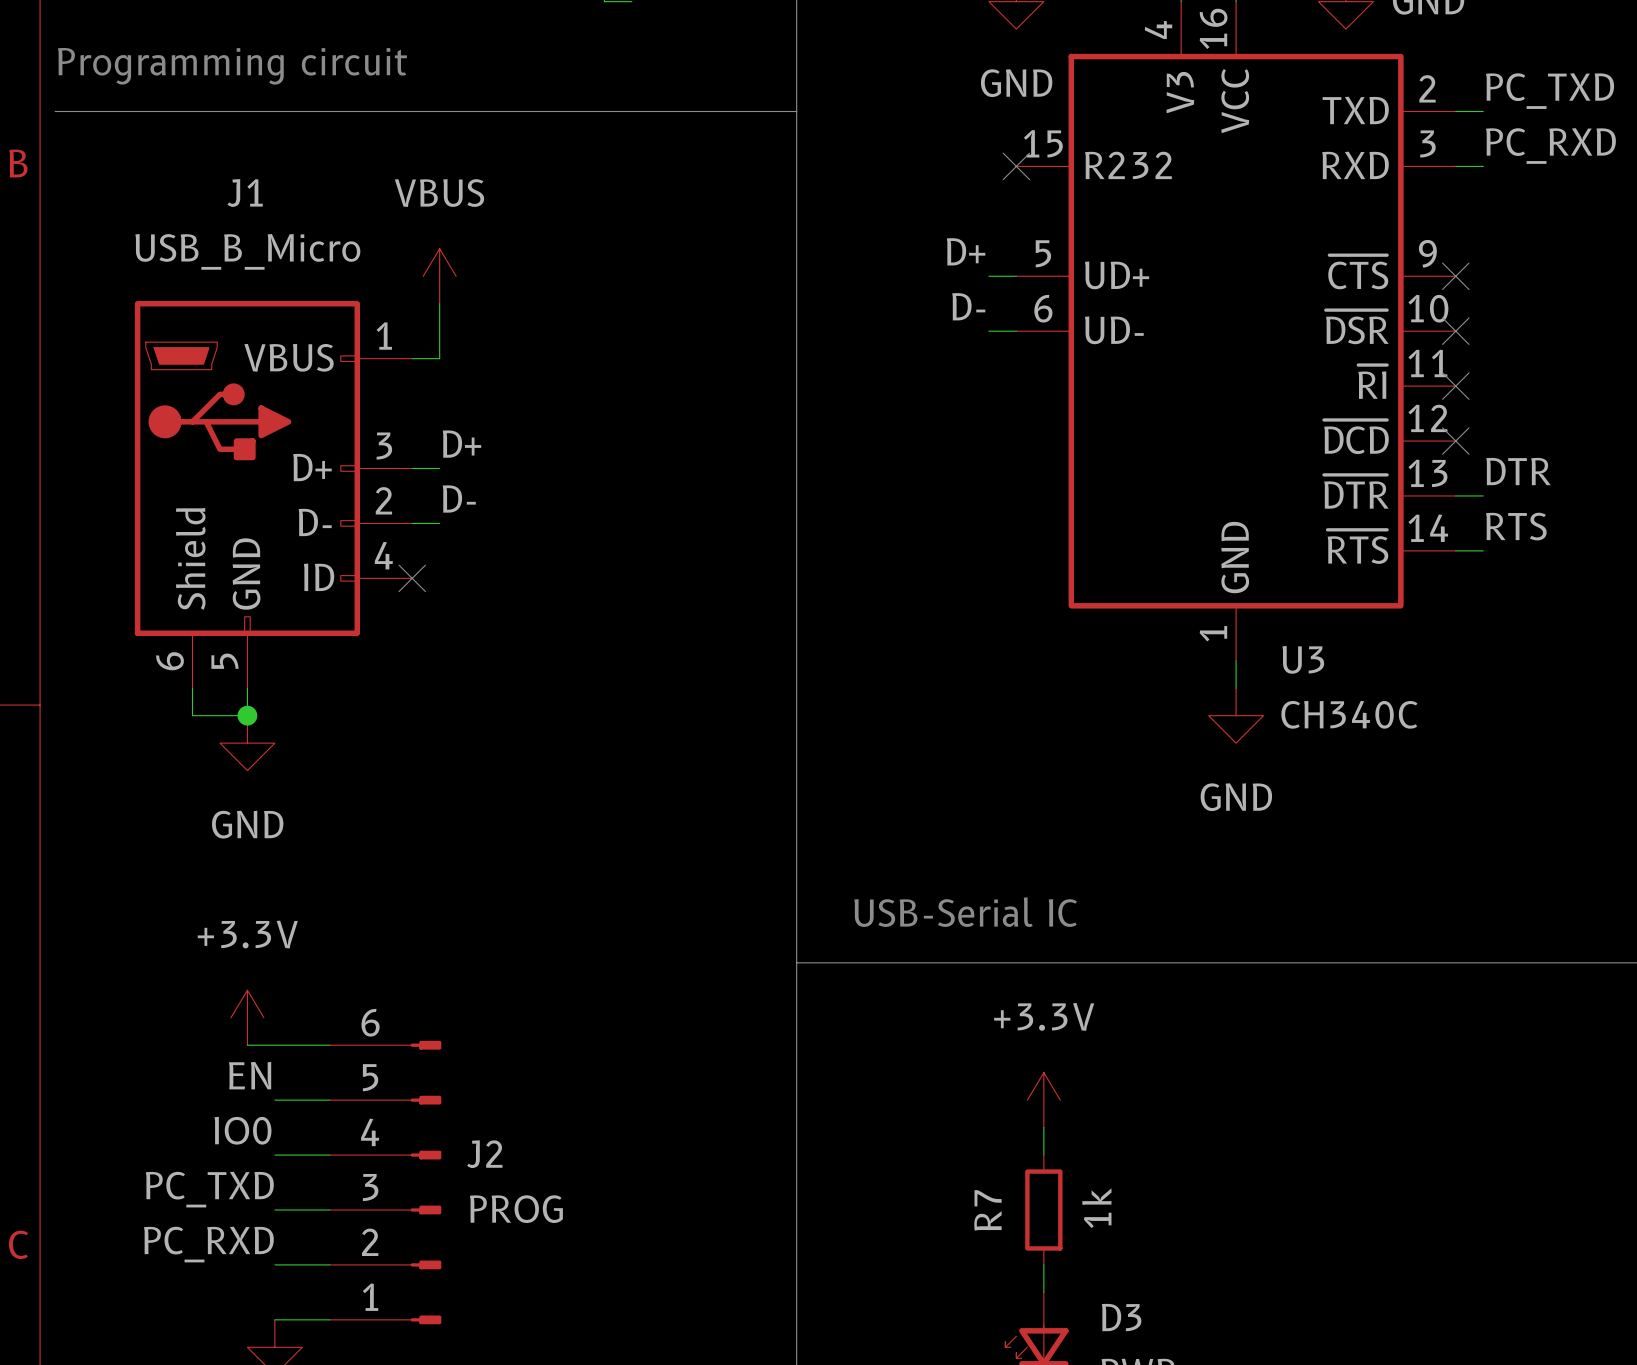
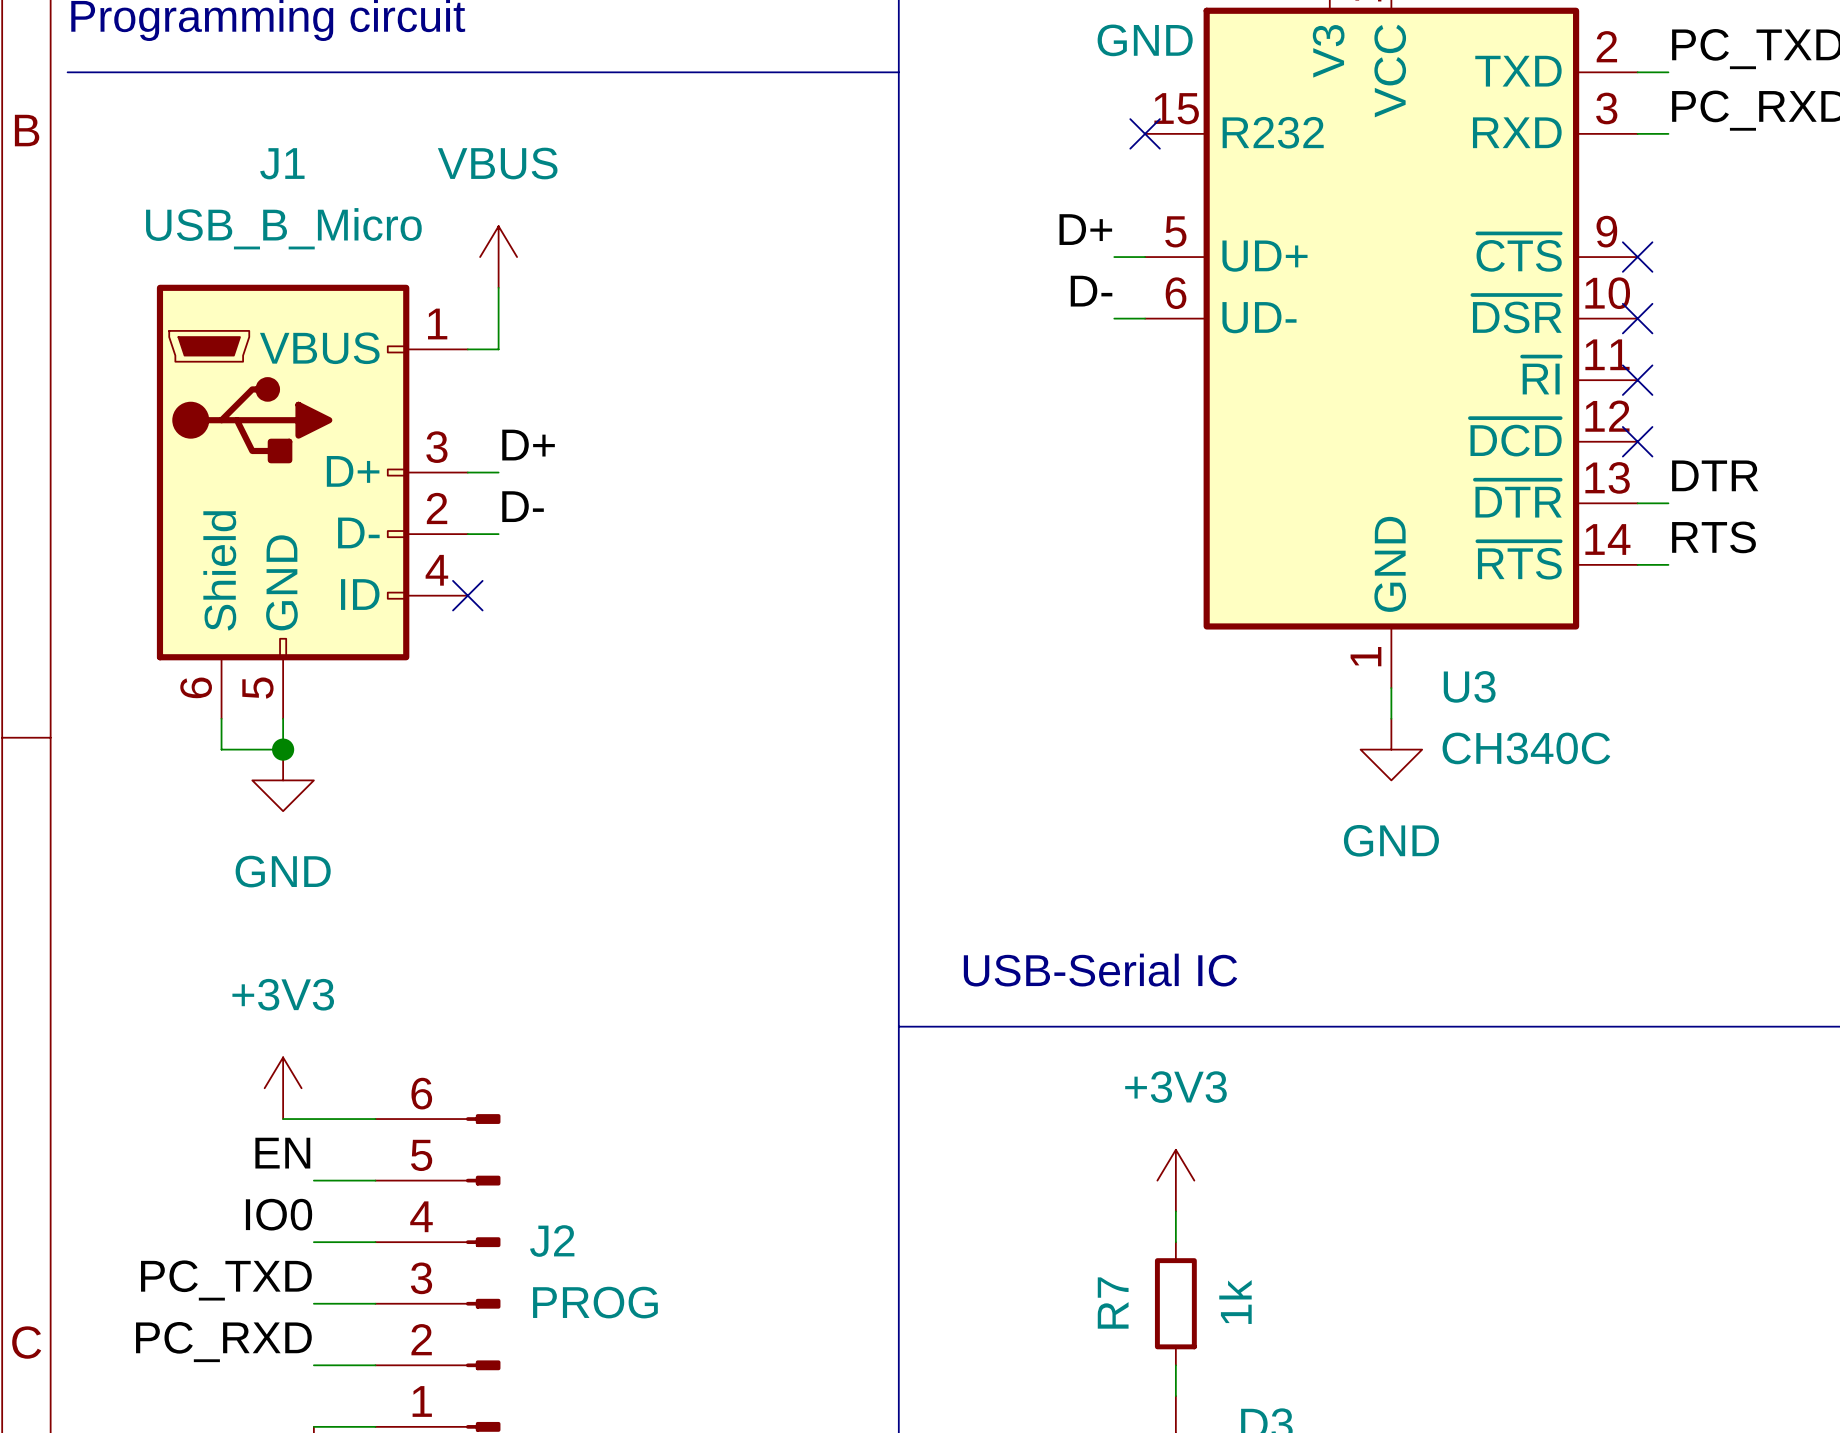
power symbol: +3.3V (247, 1017) -> +3V3 (283, 1088)
power symbol: +3.3V (1043, 1100) -> +3V3 (1175, 1180)

